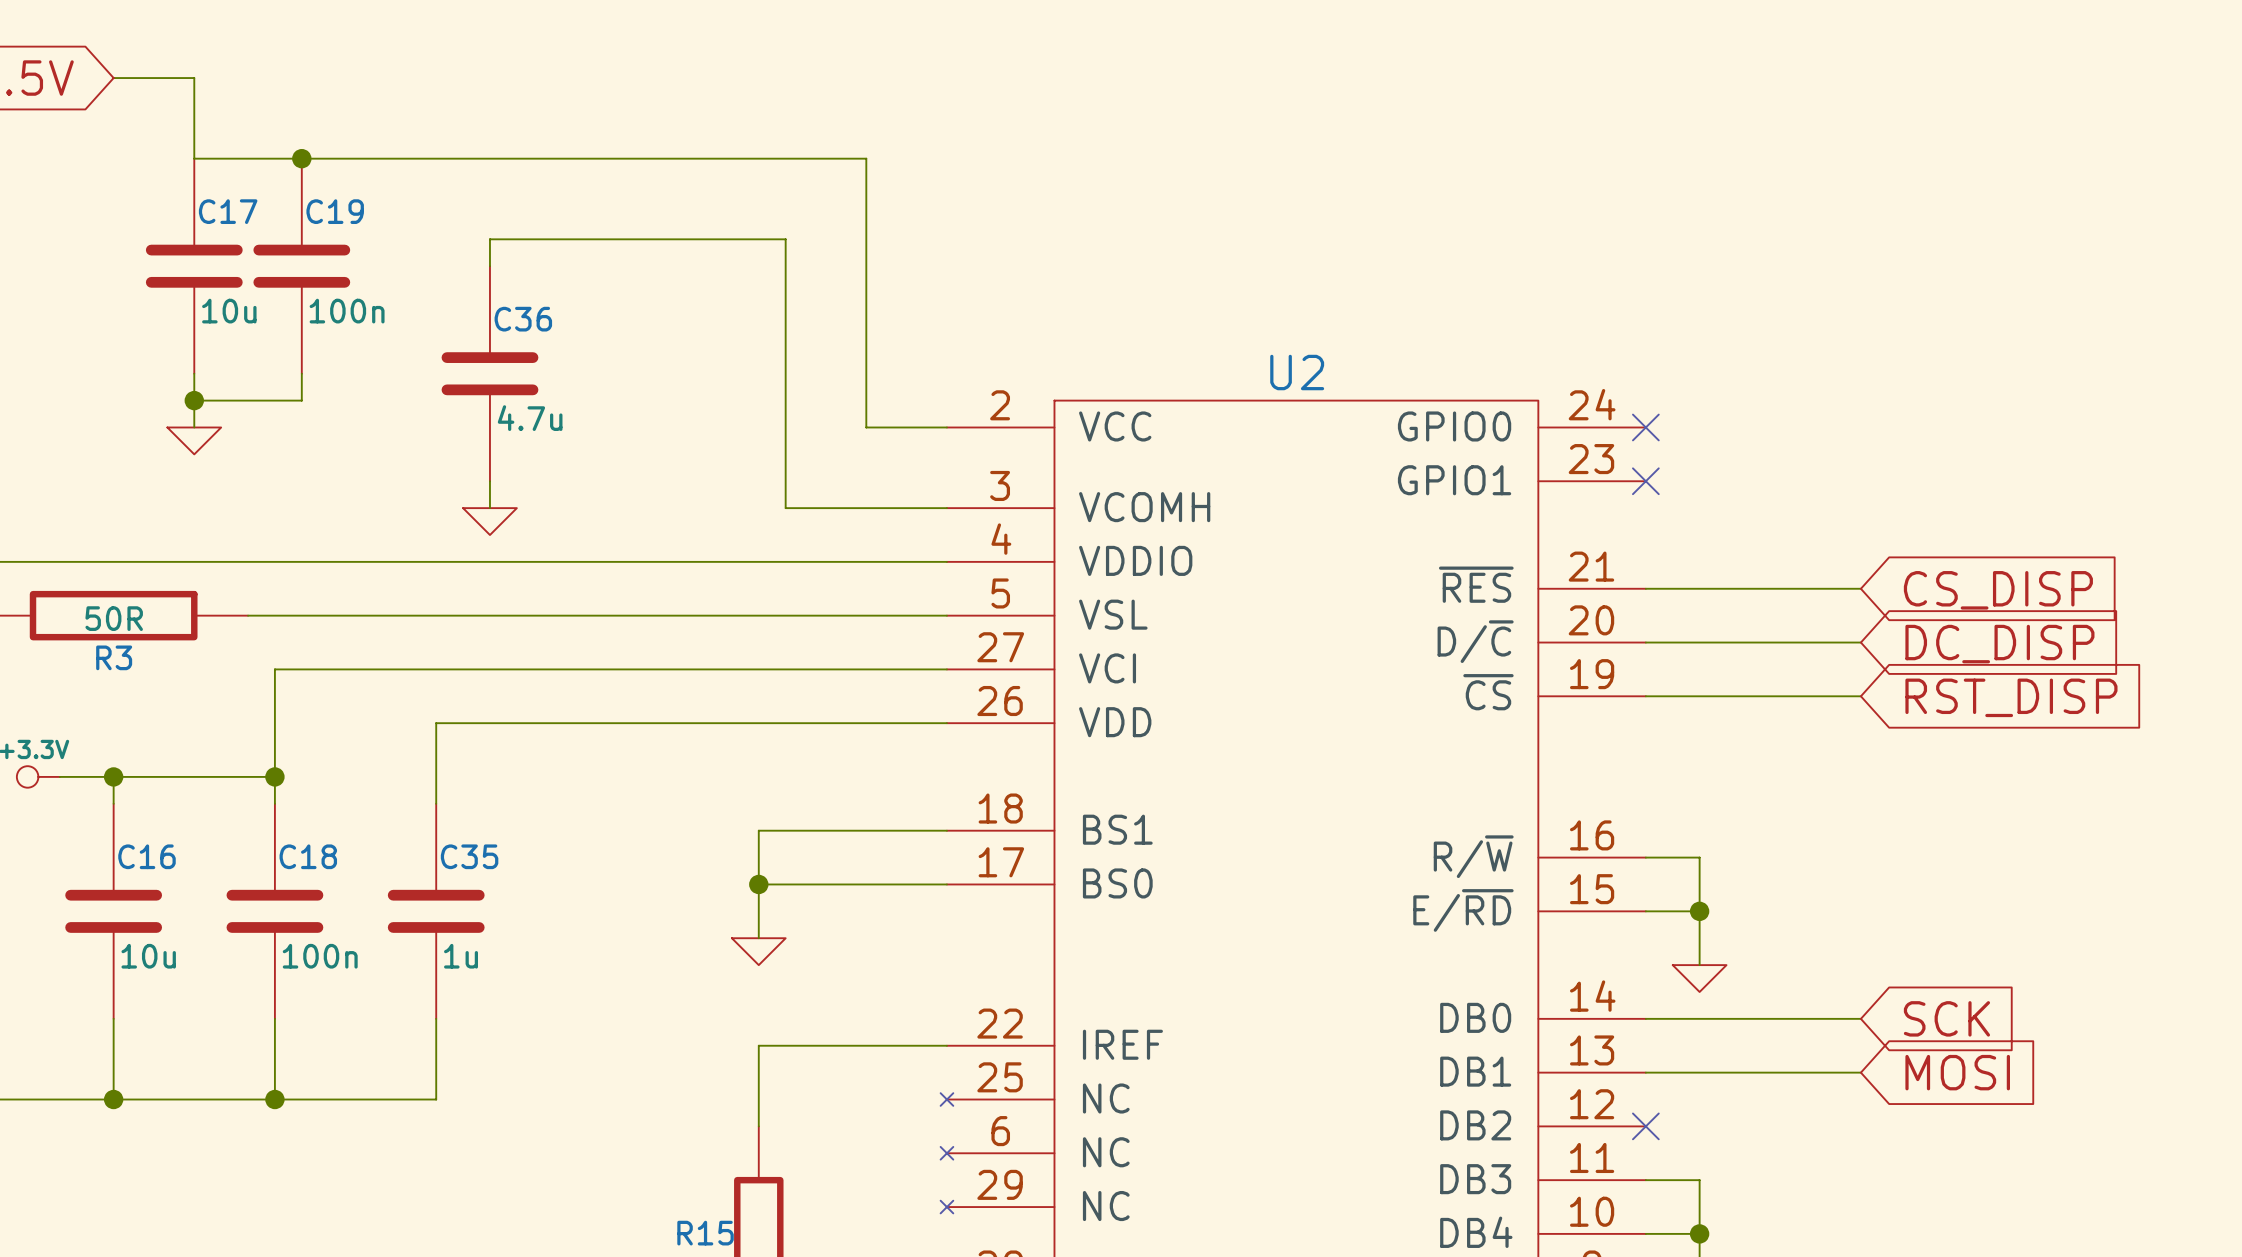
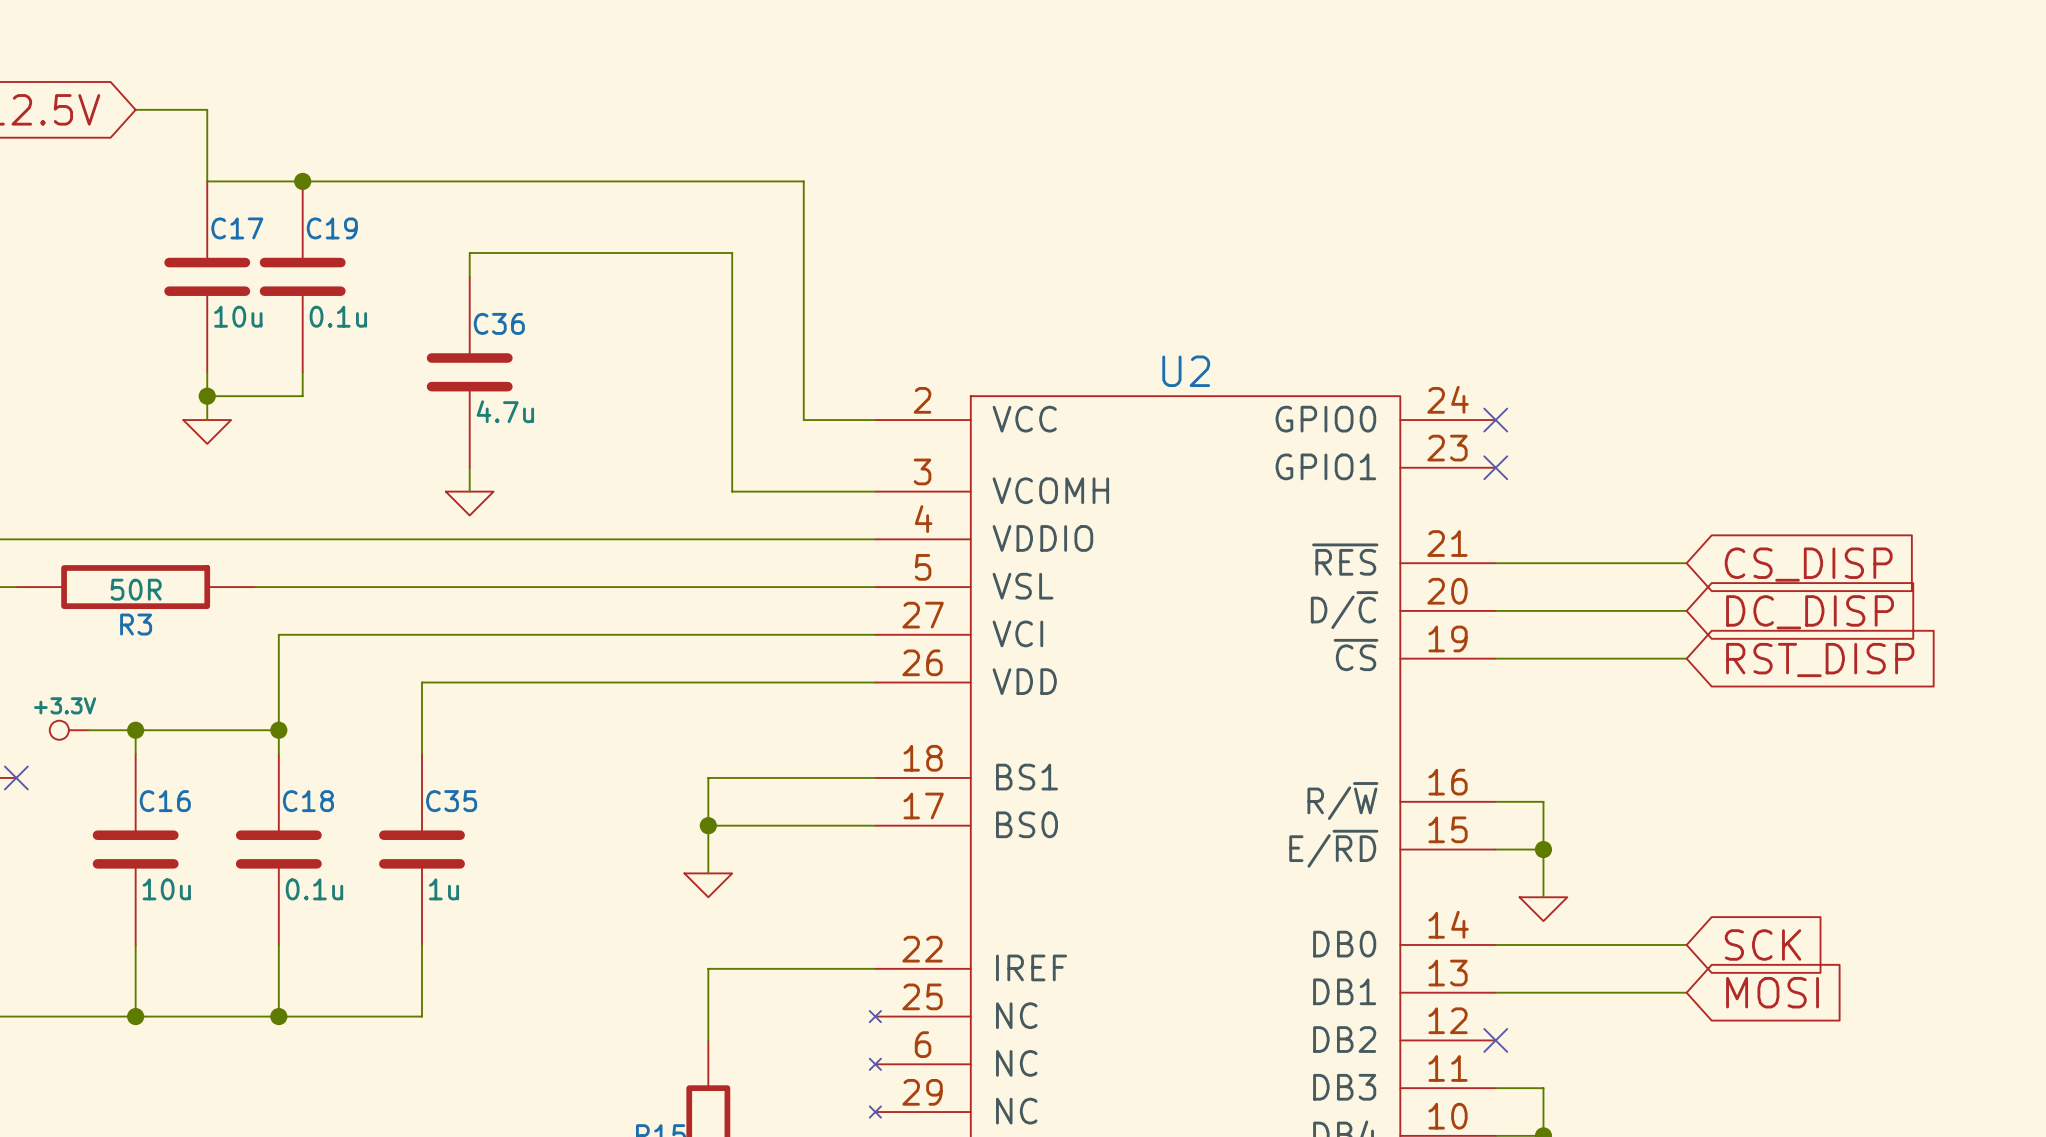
C19 value: 100n (347, 311) -> 0.1u (338, 316)
C18 value: 100n (320, 956) -> 0.1u (314, 889)

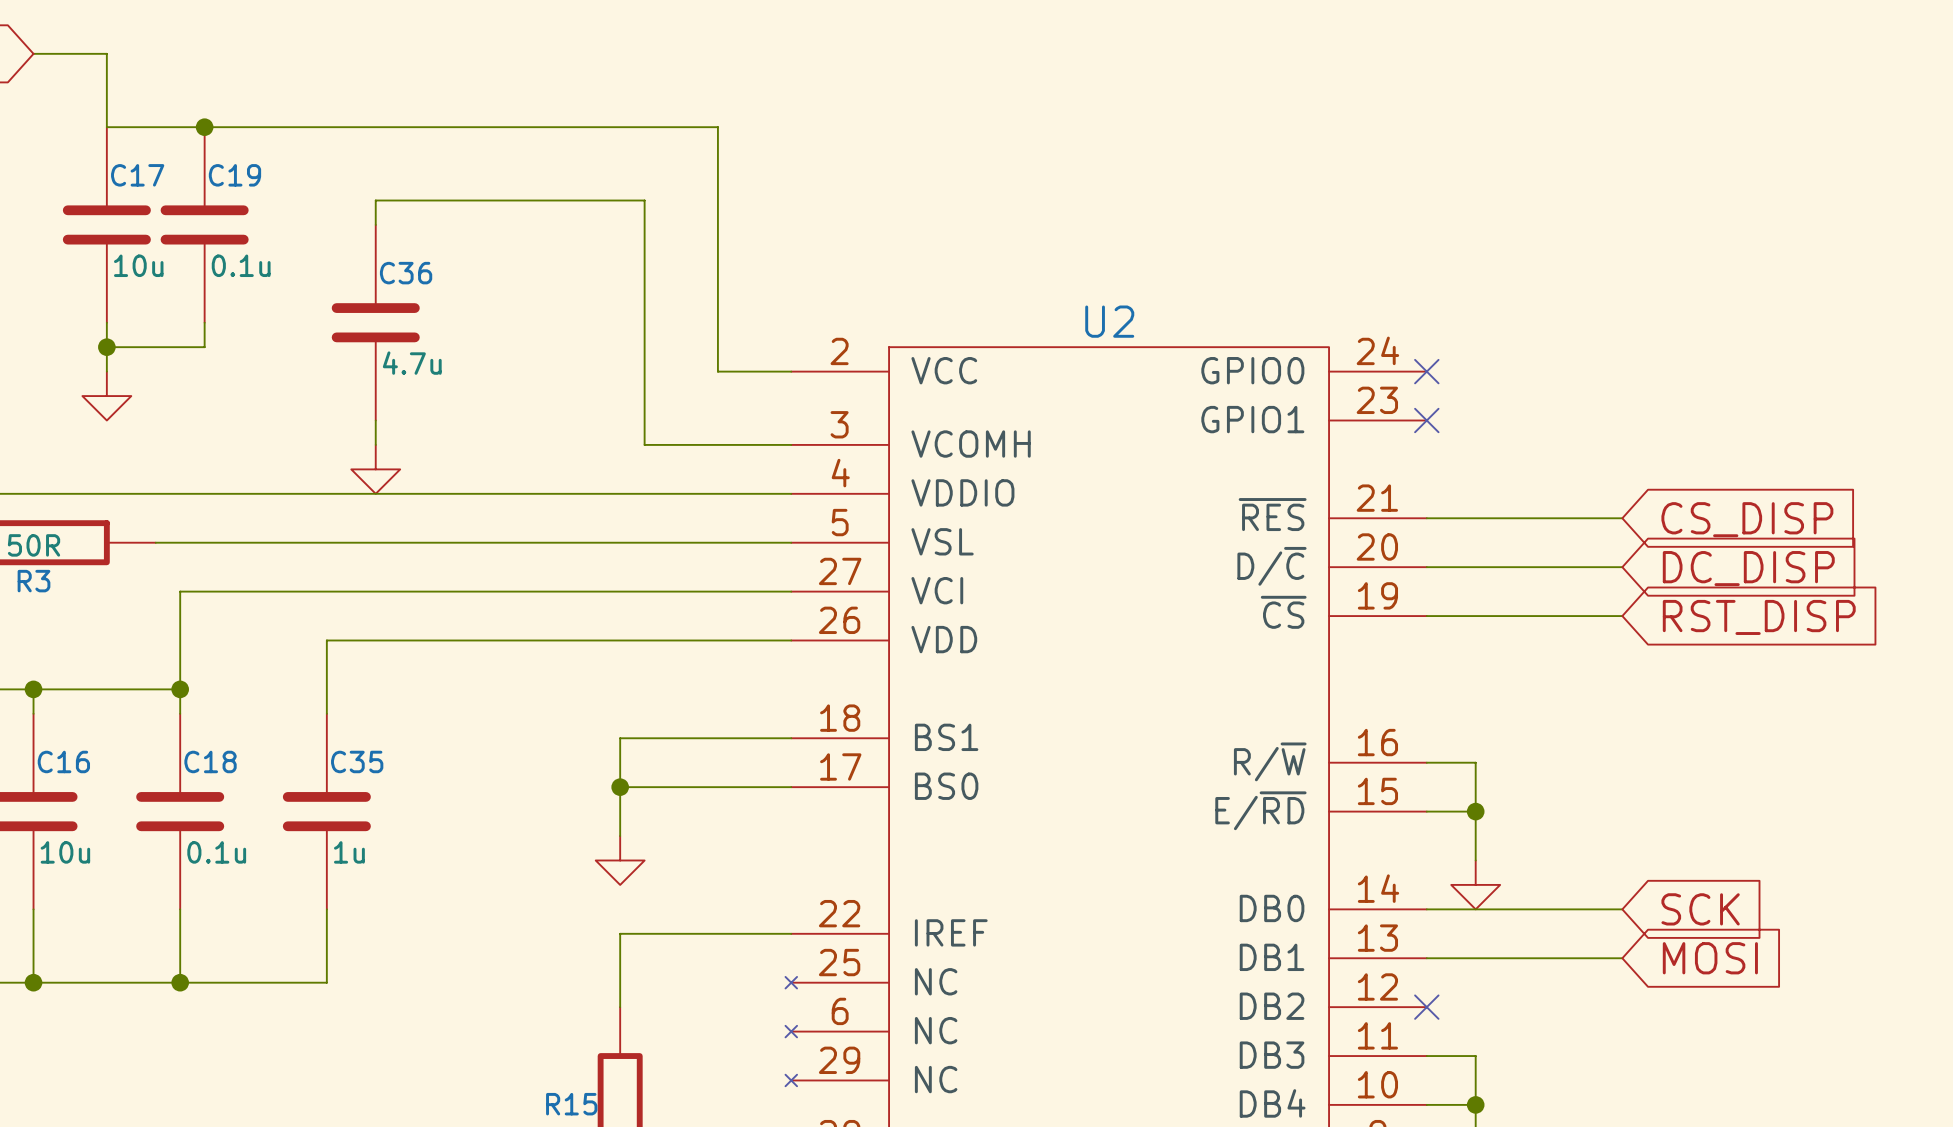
power symbol shape: [183, 420, 232, 444] -> [82, 371, 132, 421]
power symbol shape: [445, 491, 494, 516] -> [351, 444, 401, 494]
power symbol shape: [684, 873, 733, 898] -> [595, 836, 645, 885]
power symbol shape: [1519, 897, 1568, 922] -> [1451, 860, 1501, 910]

